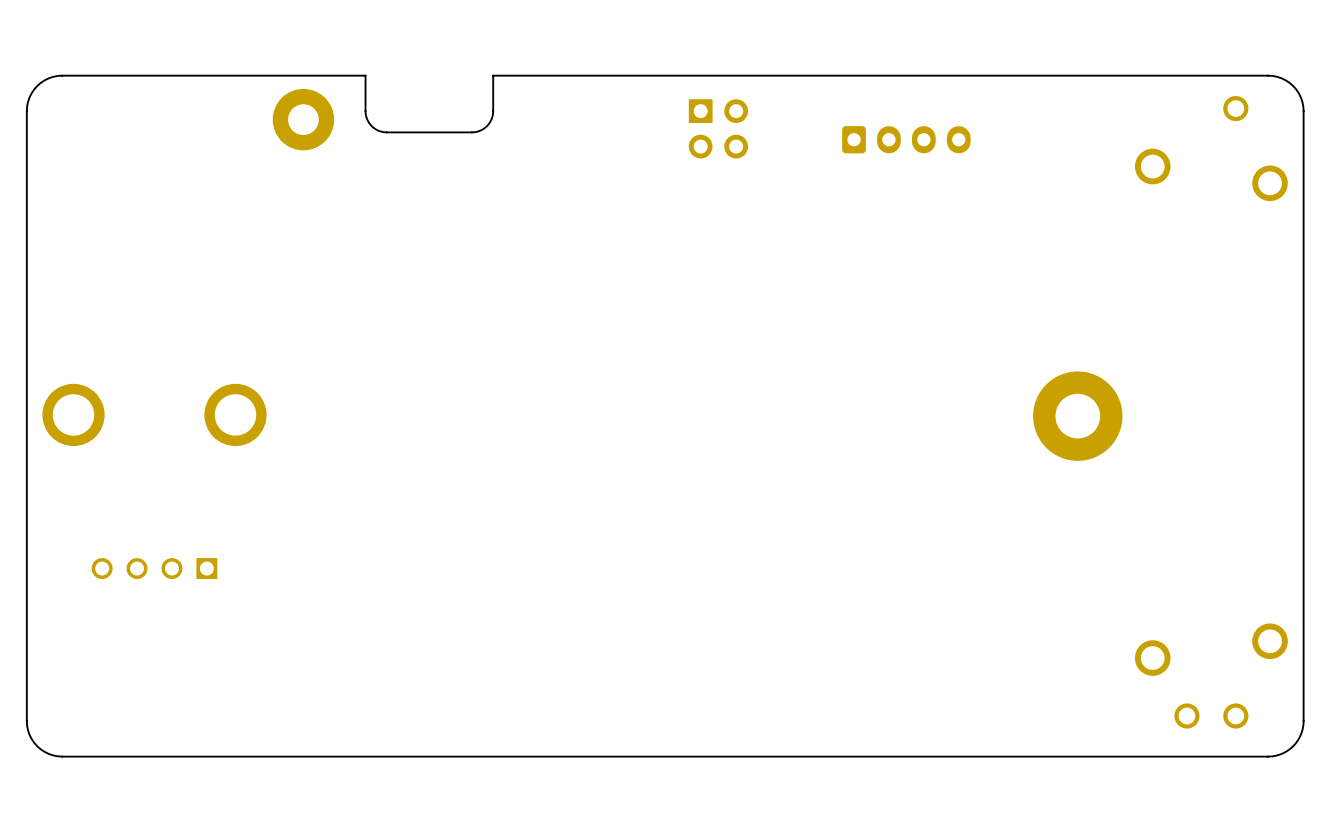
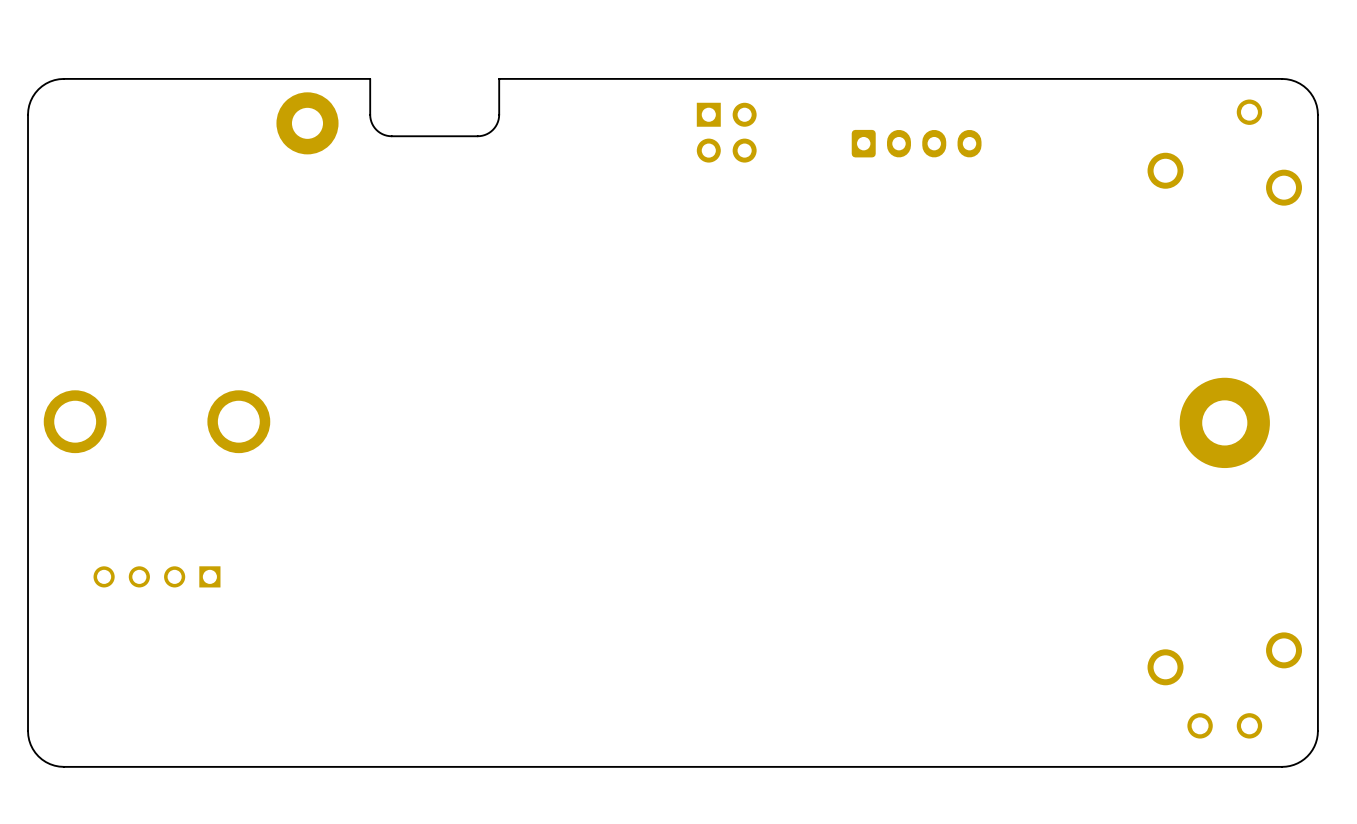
part position: (1077, 416) -> (1224, 422)

